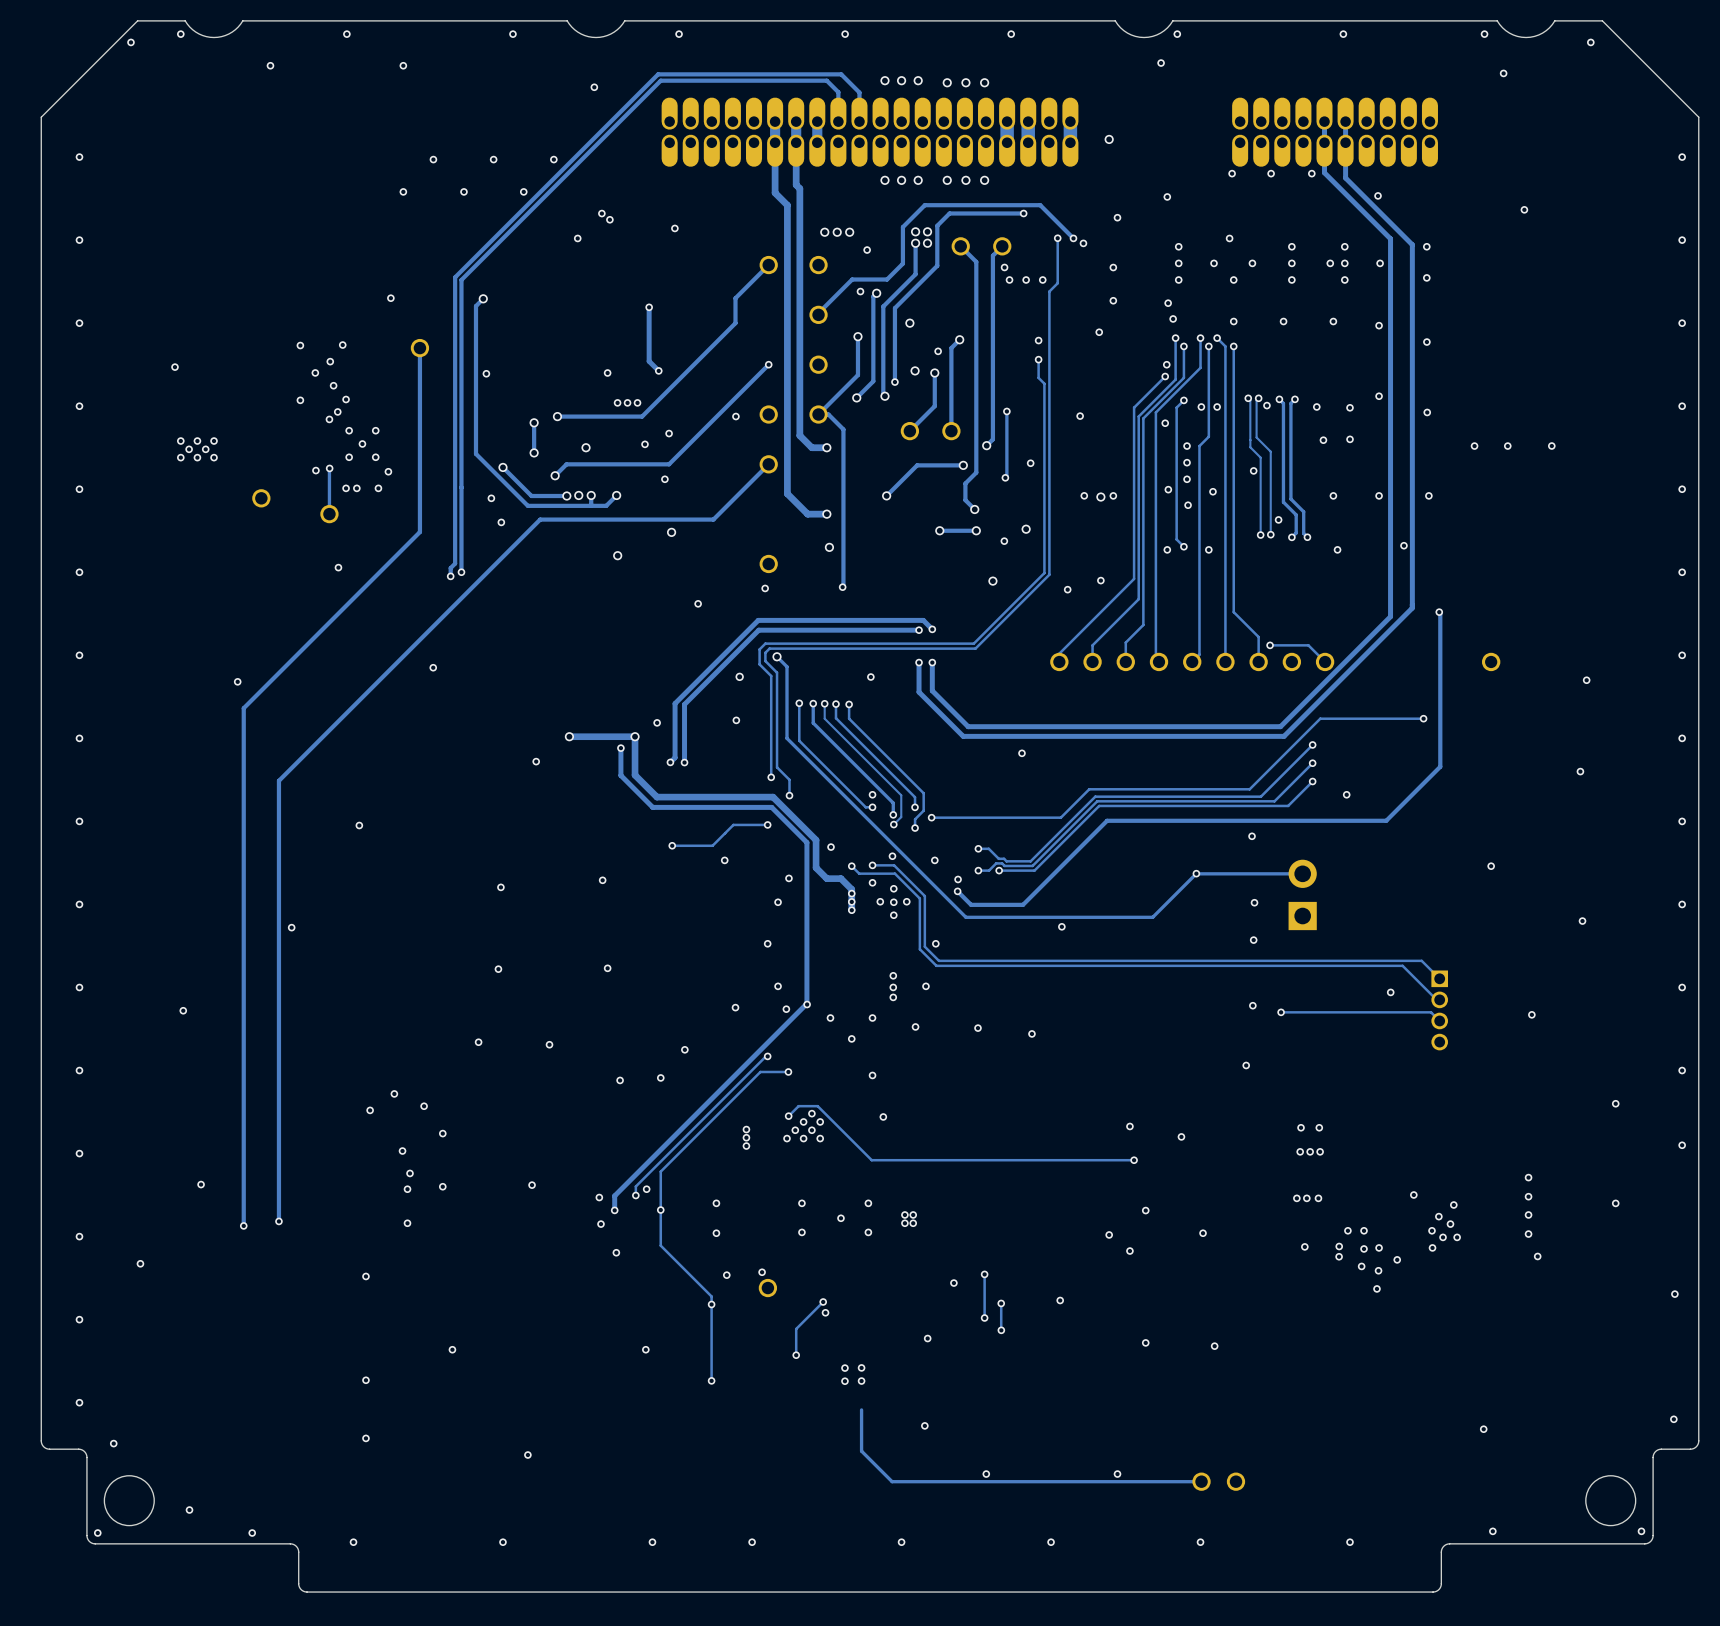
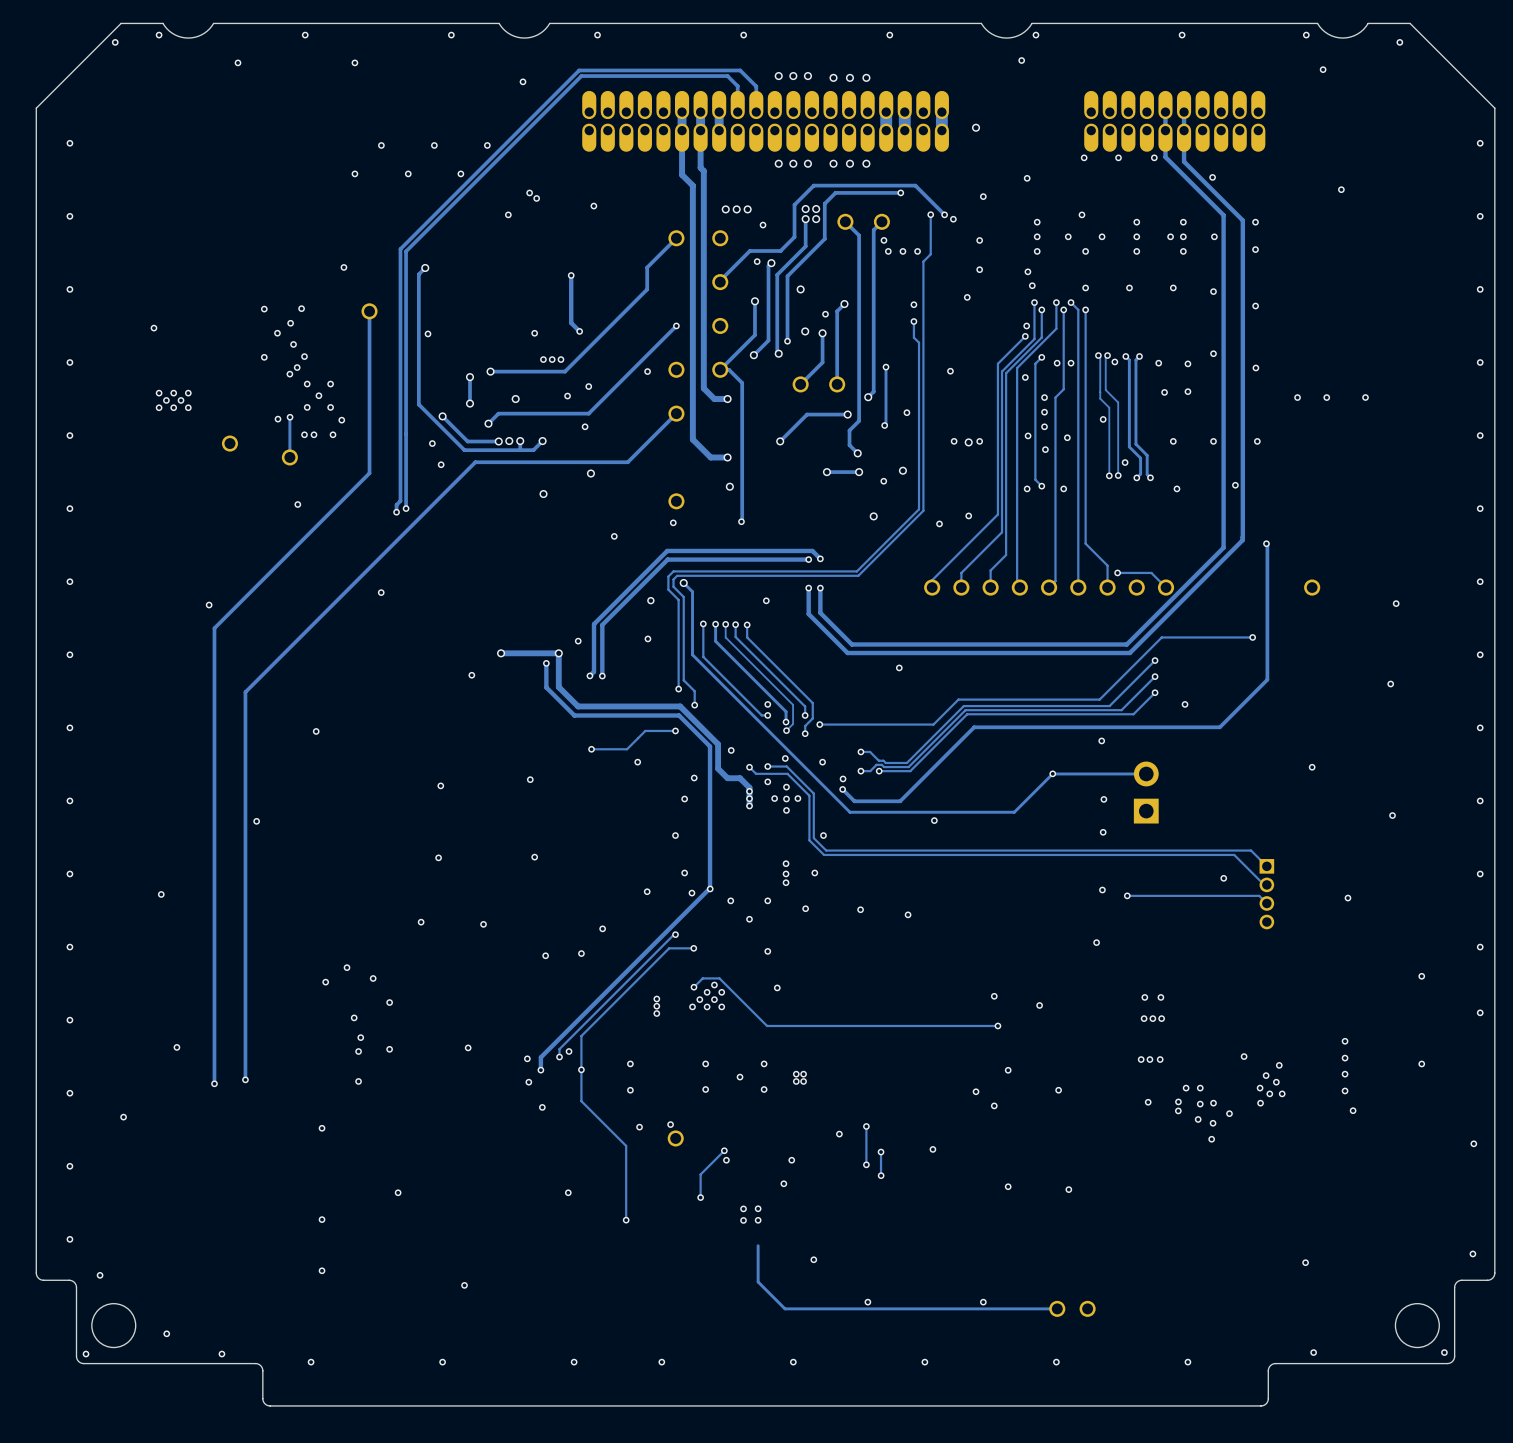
via: (711, 1304) -> none
via: none -> (791, 1160)
via: (927, 1338) -> none
via: none -> (783, 1183)

